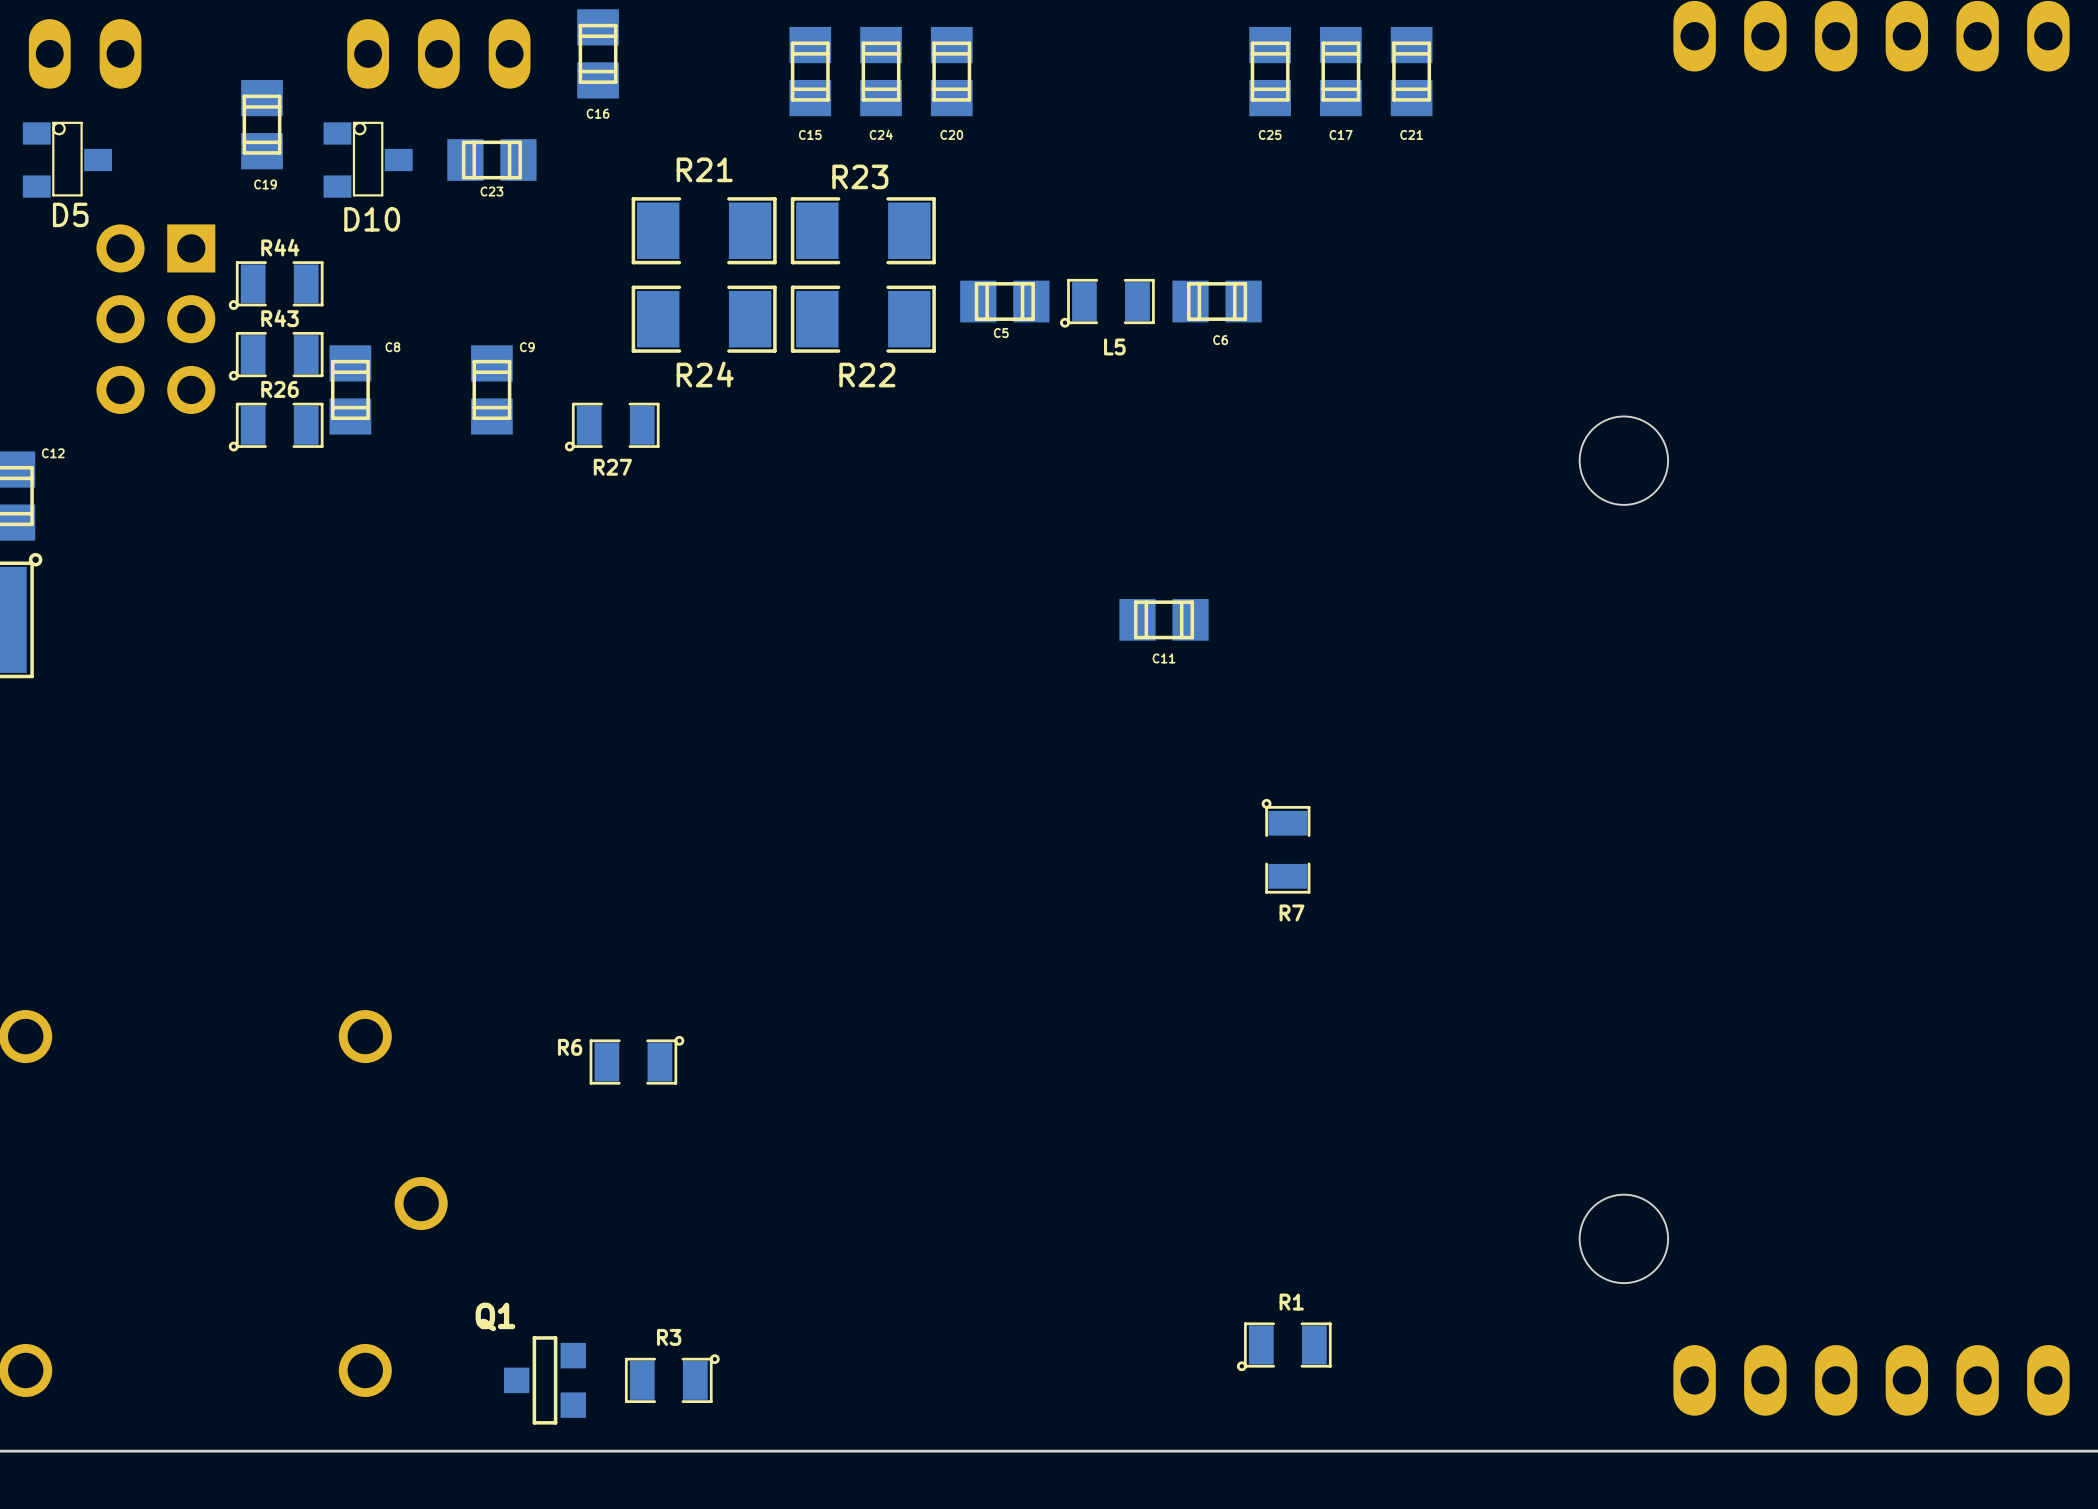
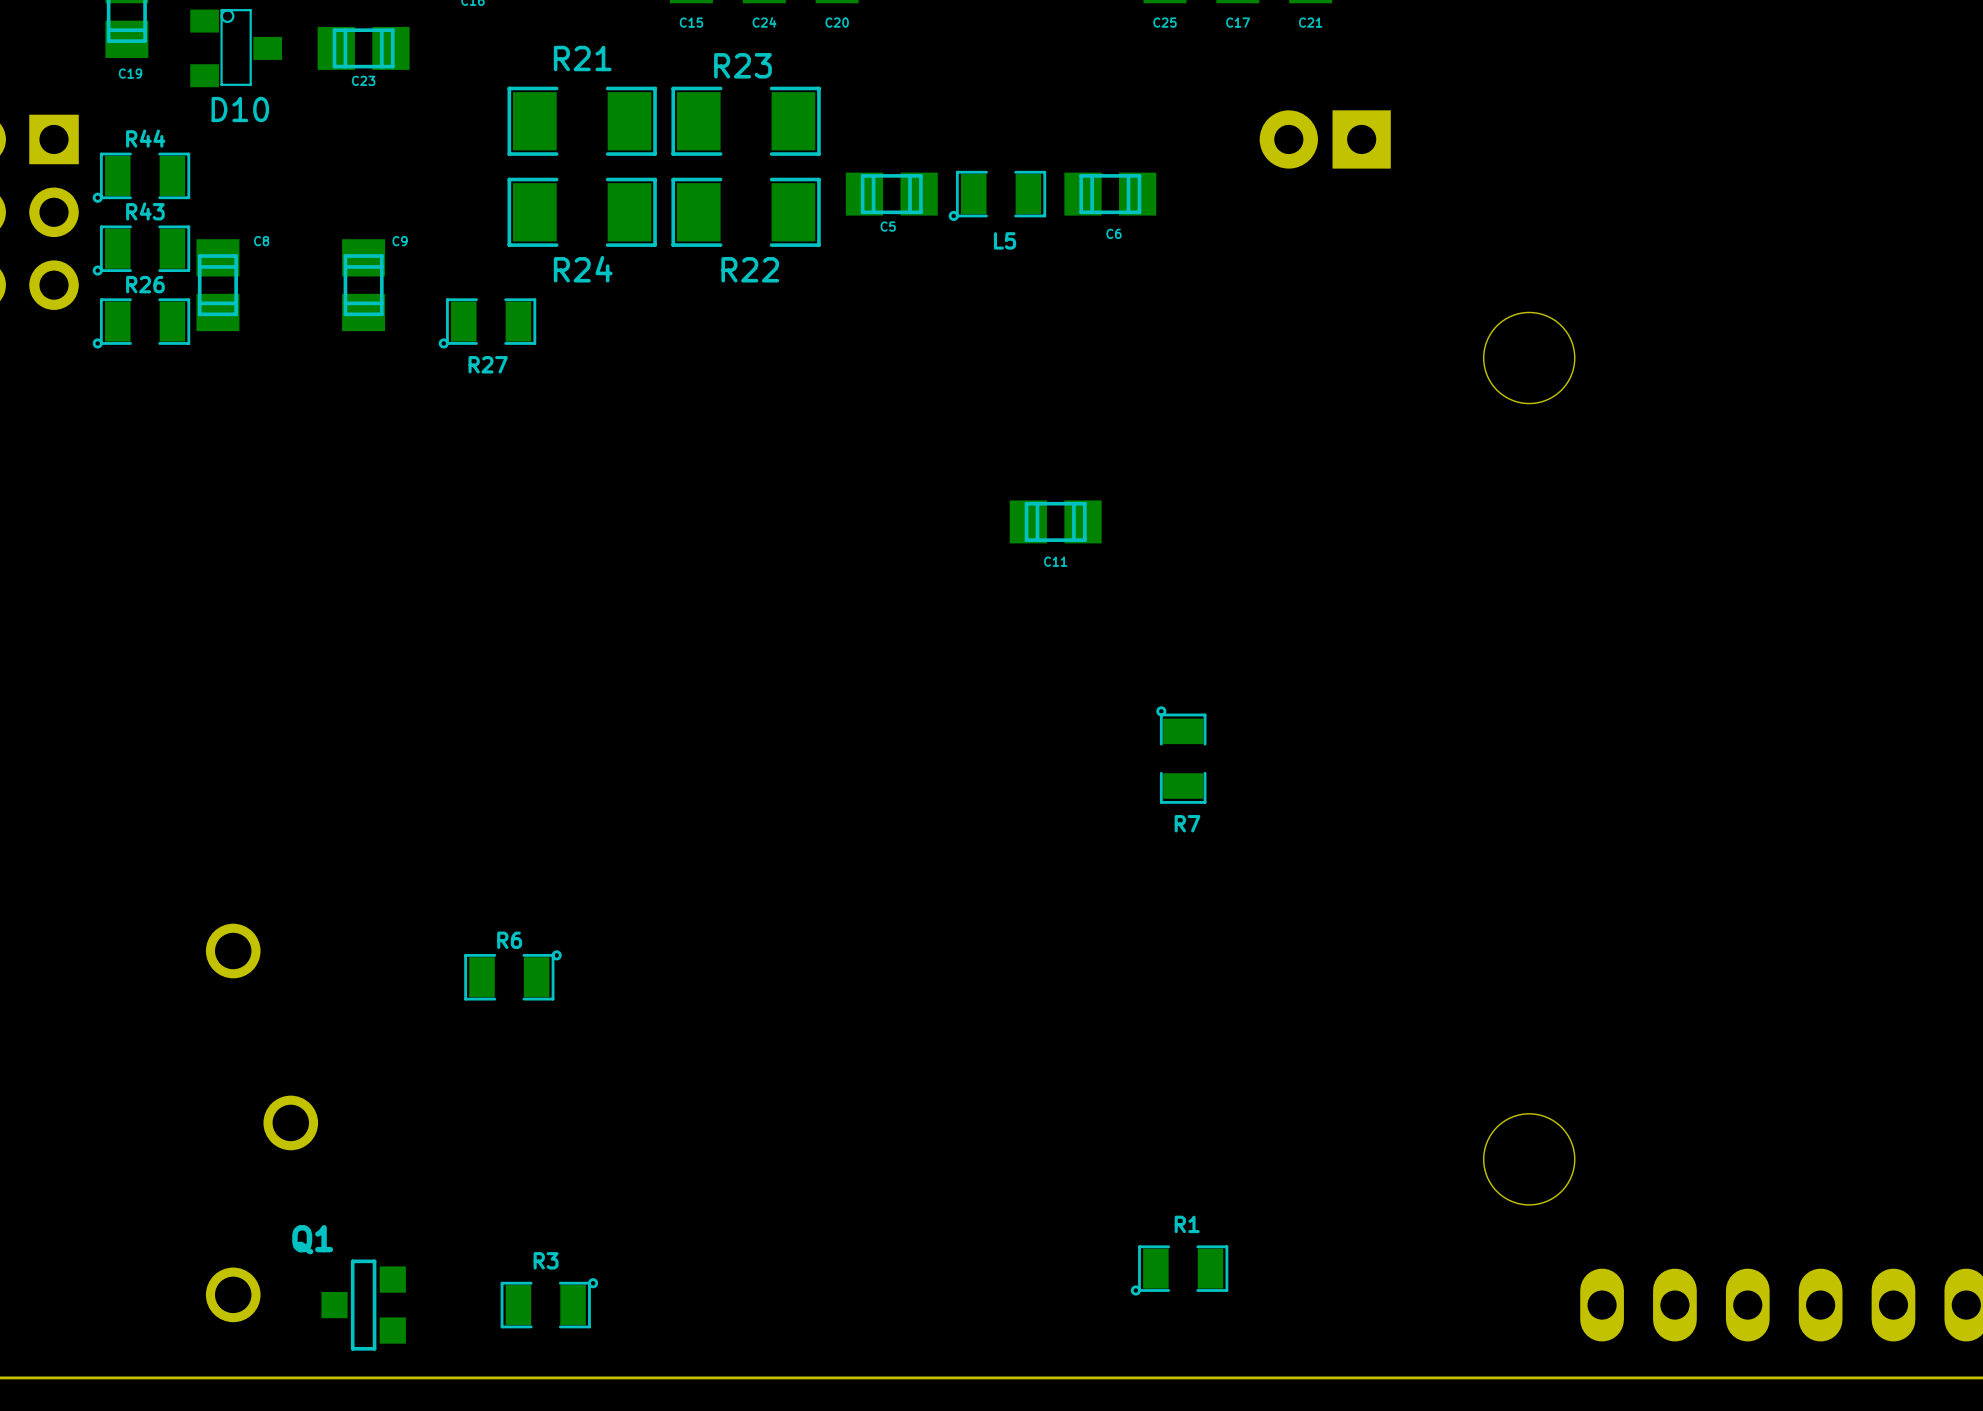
part: none -> (1325, 139)
R6 name position: R6 (570, 1047) -> R6 (509, 940)
Q1 position: (544, 1380) -> (363, 1305)

